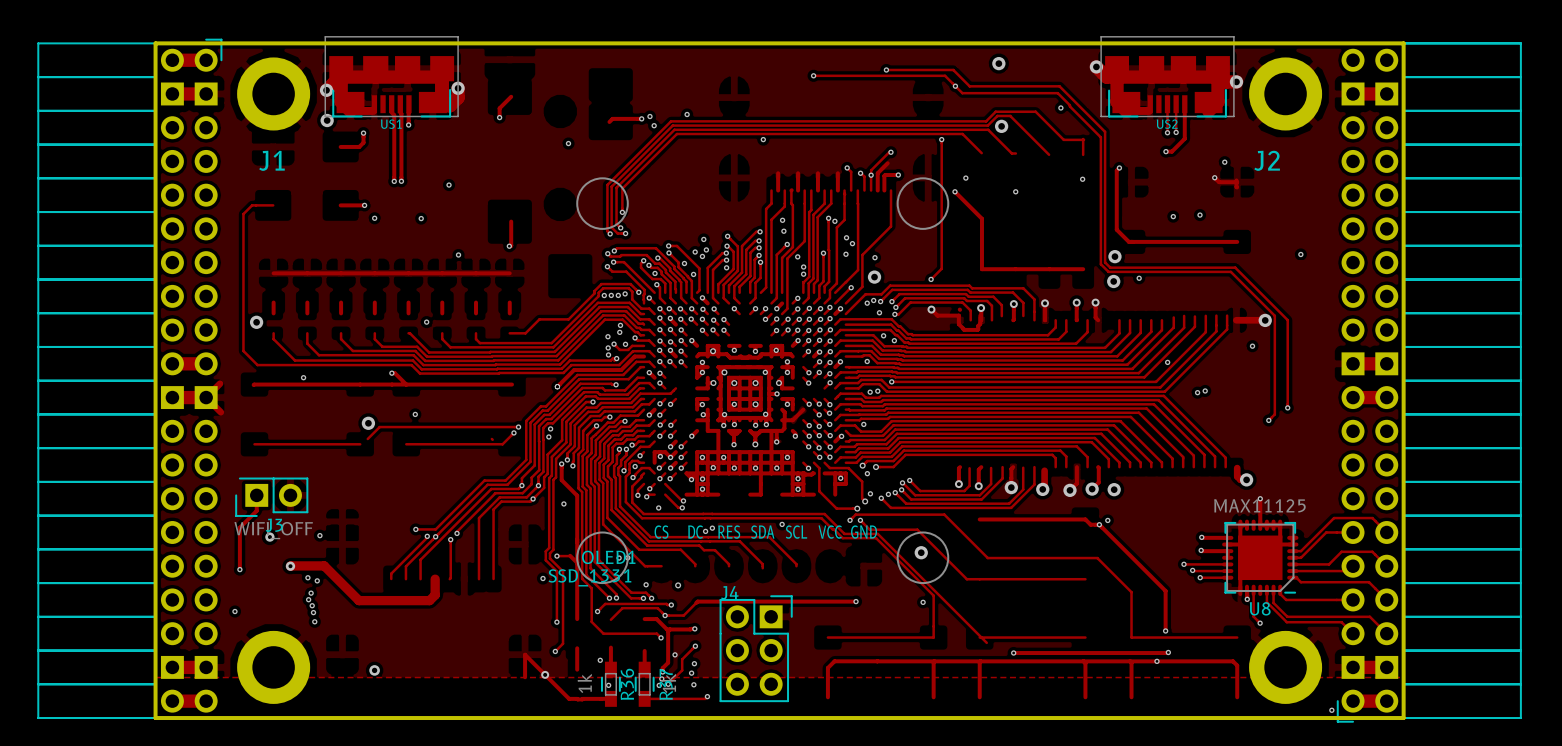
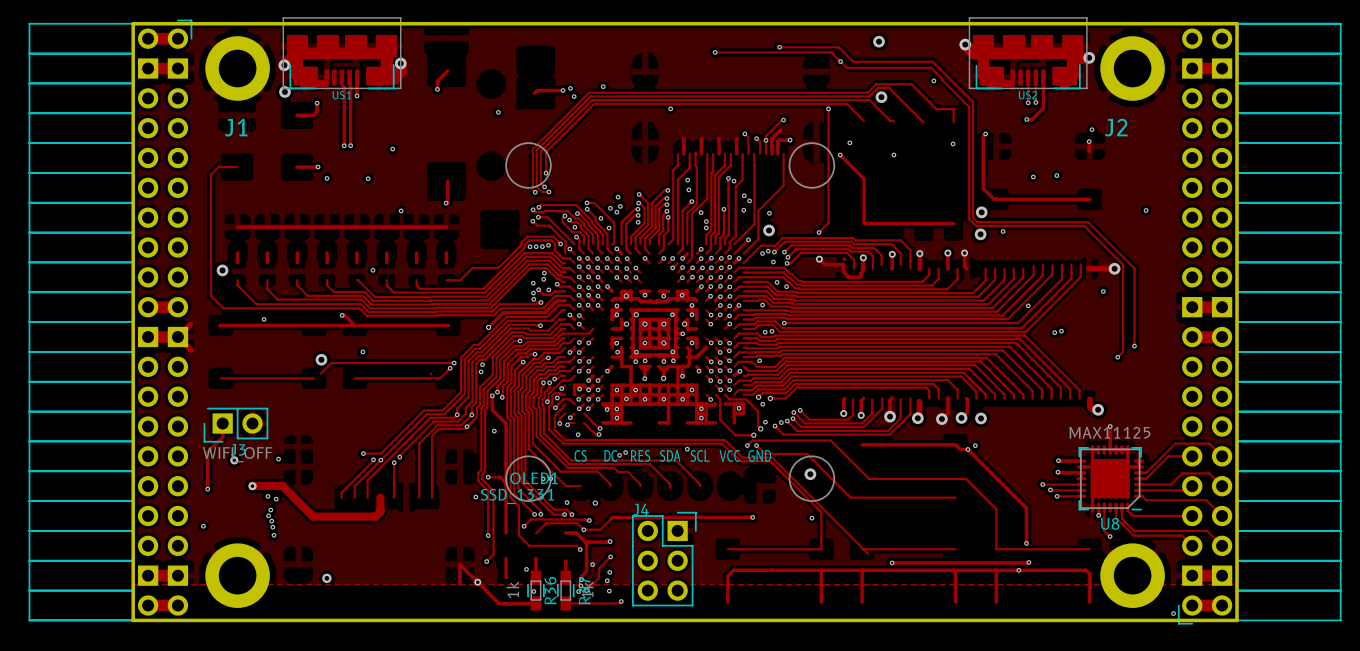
via: (1224, 162) -> none
via: none -> (1091, 129)
via: none -> (1089, 141)
track: (1214, 177) (1219, 182) (1237, 182) -> none
via: (1214, 177) -> none

